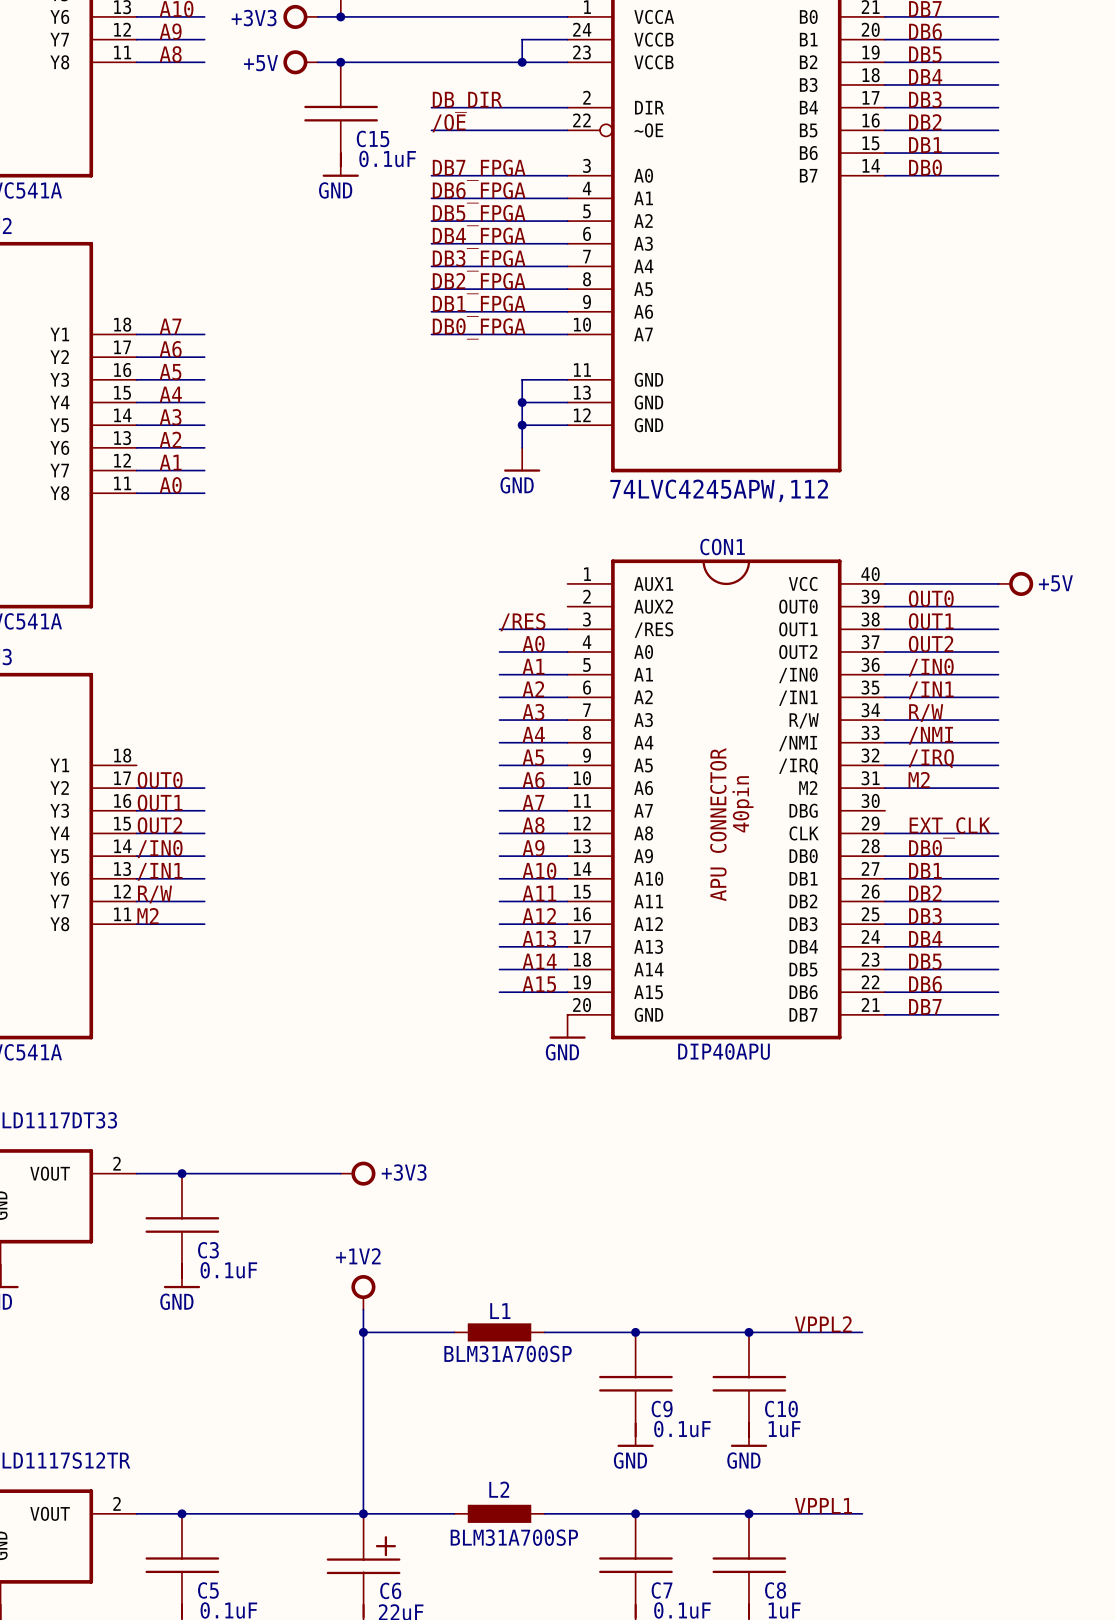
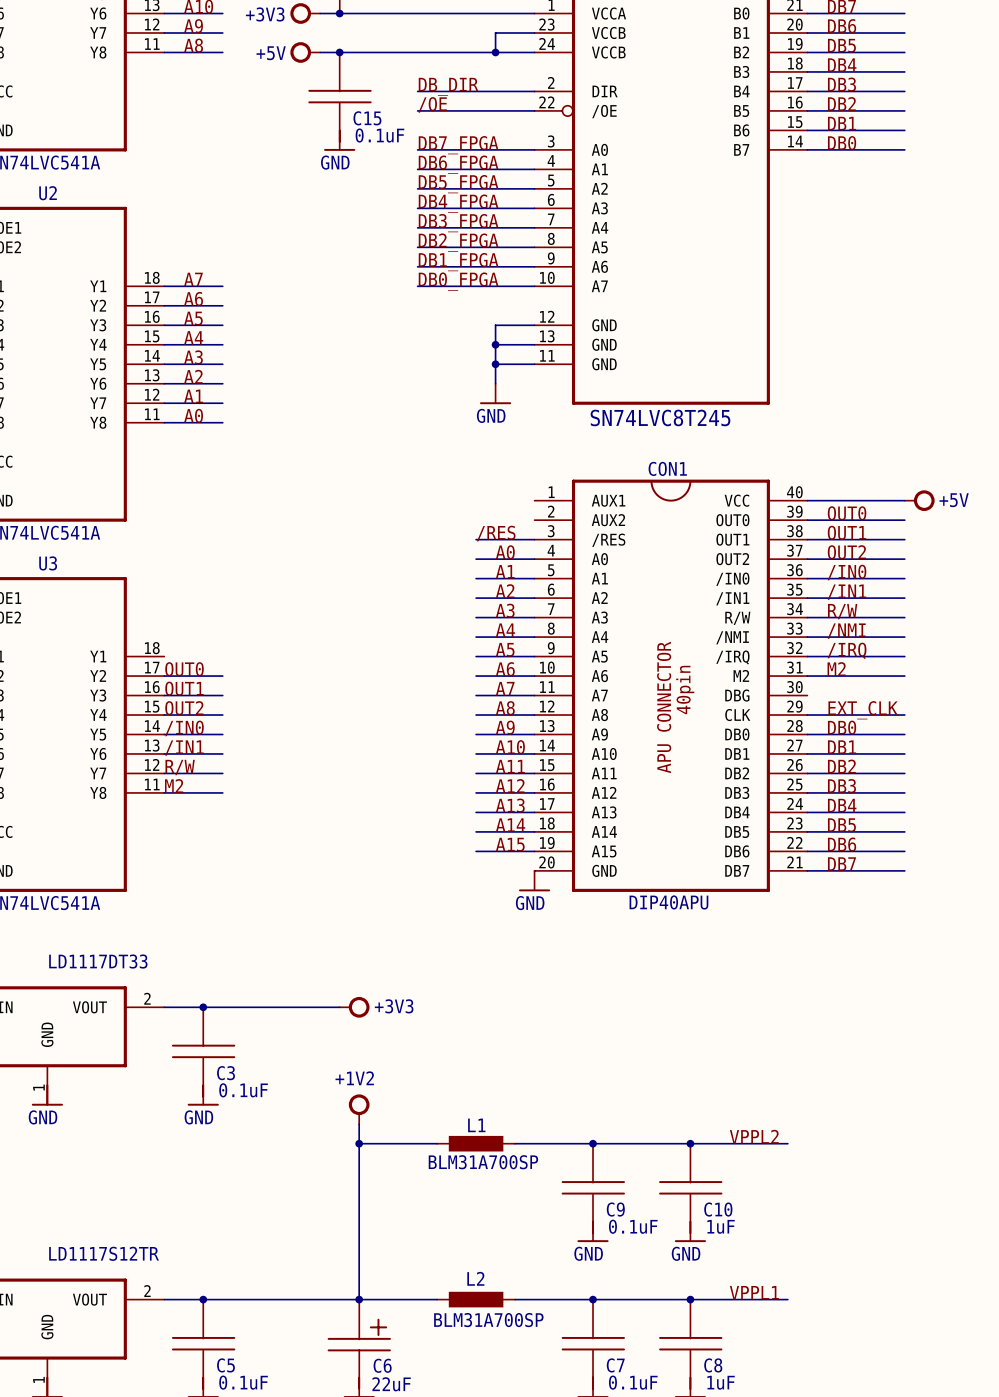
part pin number: 24 (582, 29) -> 23 (546, 24)
part pin number: 23 (581, 52) -> 24 (547, 43)
part pin name: ~OE (648, 130) -> /OE (604, 111)
part pin number: 11 (582, 370) -> 12 (547, 316)
part pin number: 12 (582, 415) -> 11 (547, 355)
part value: 74LVC4245APW,112 (719, 490) -> SN74LVC8T245 (660, 417)

